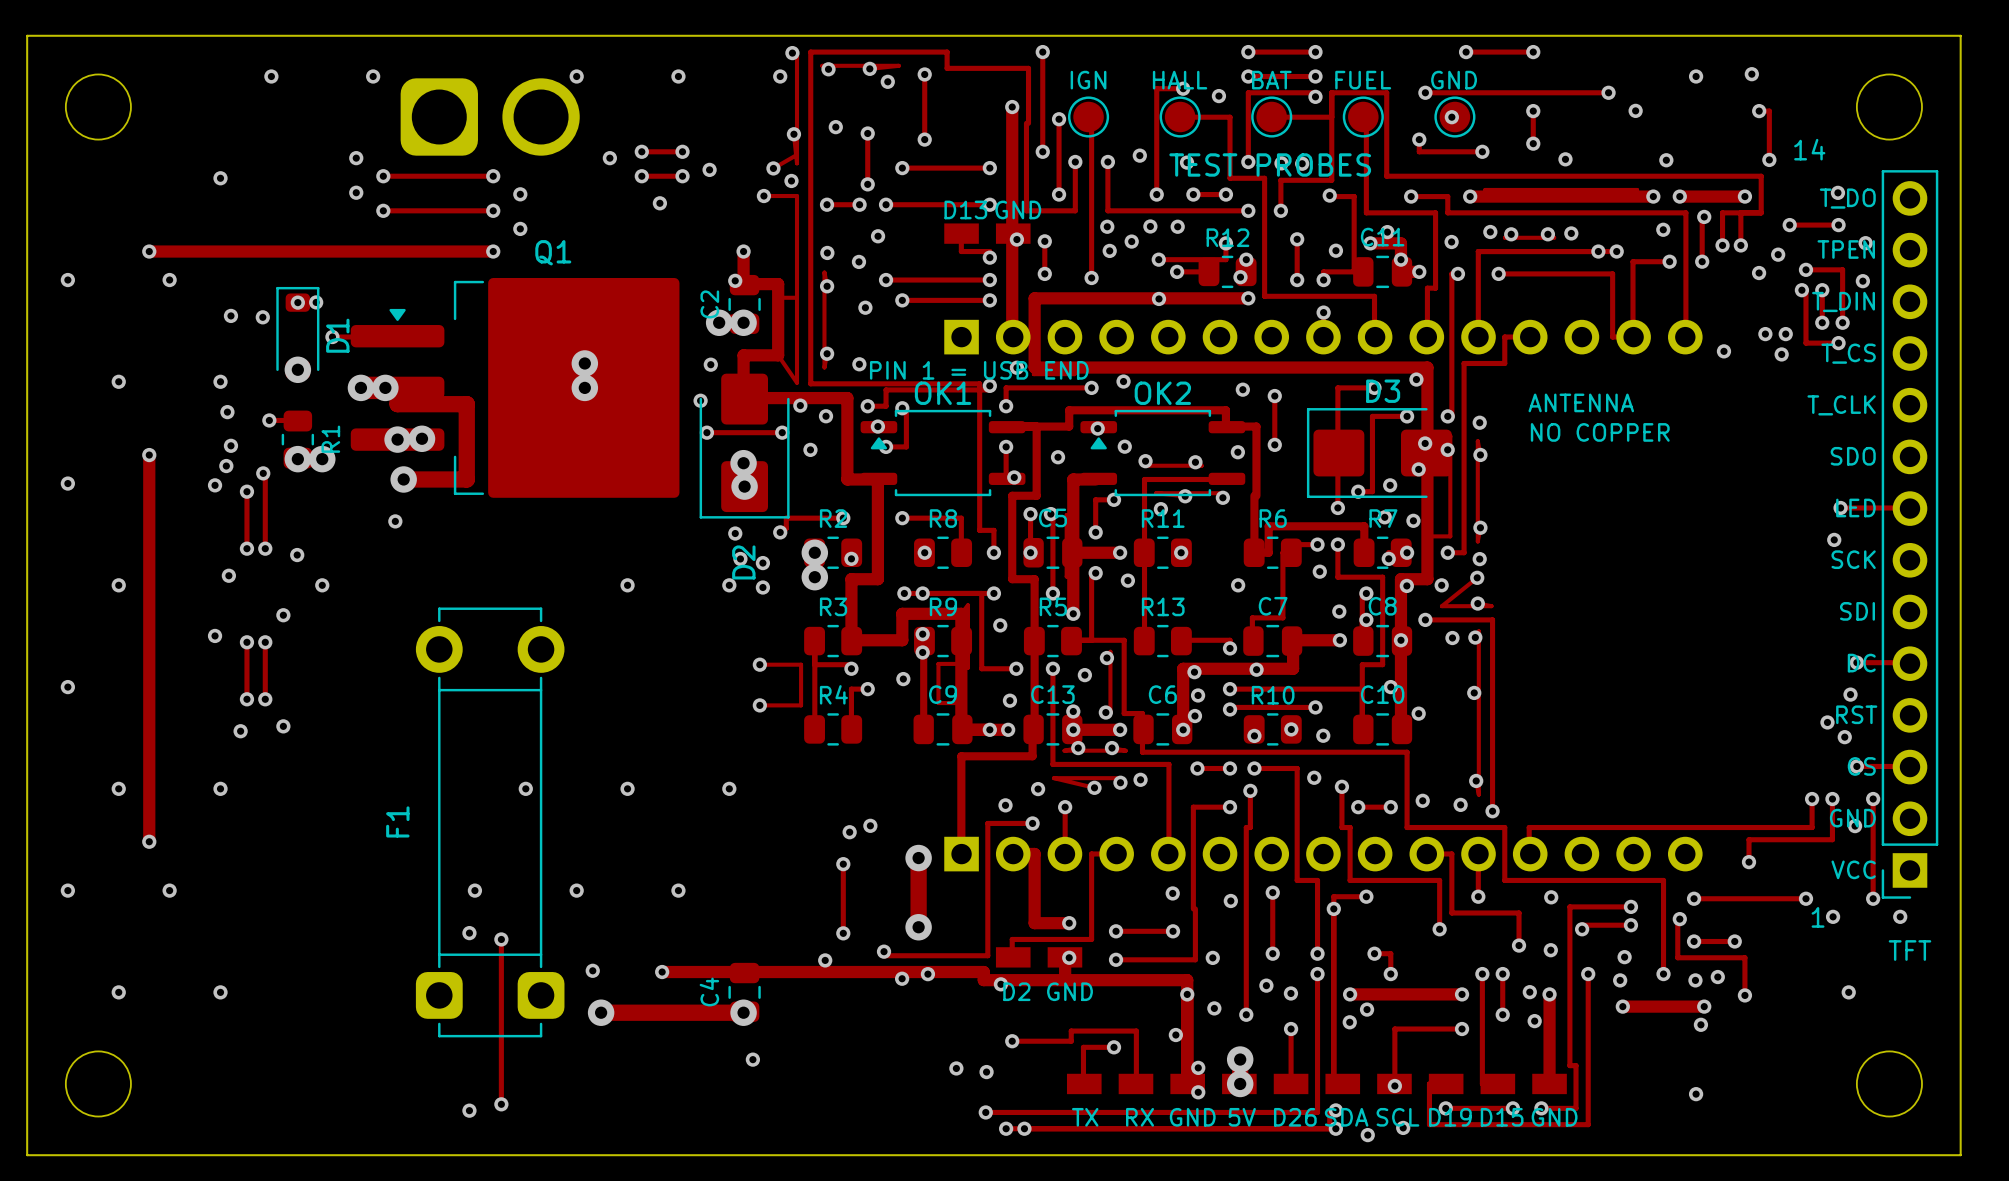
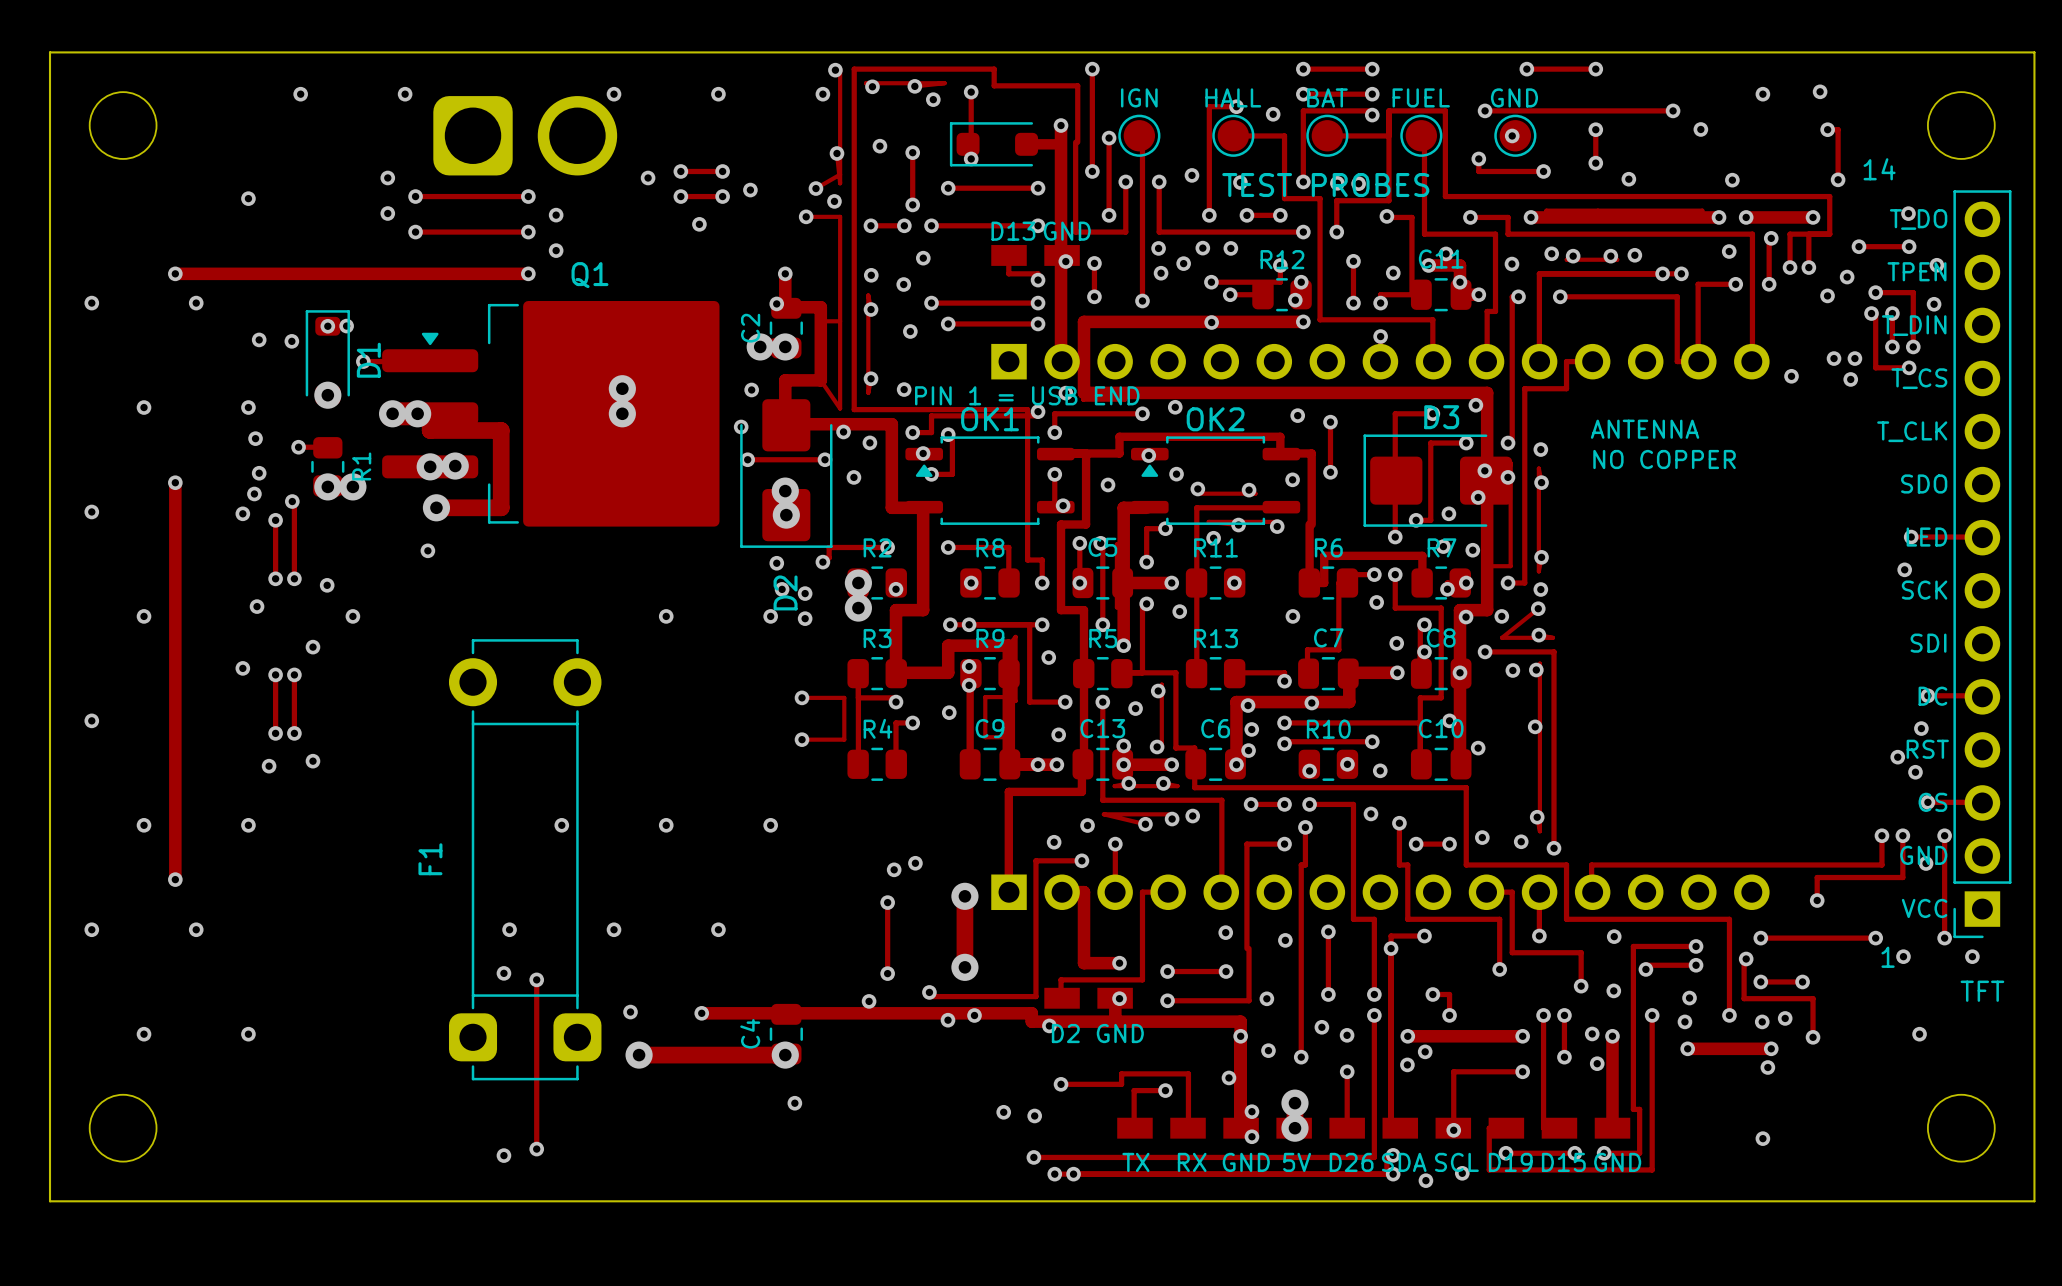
part: none -> (993, 144)
track: none -> (1026, 144) (1061, 144)

